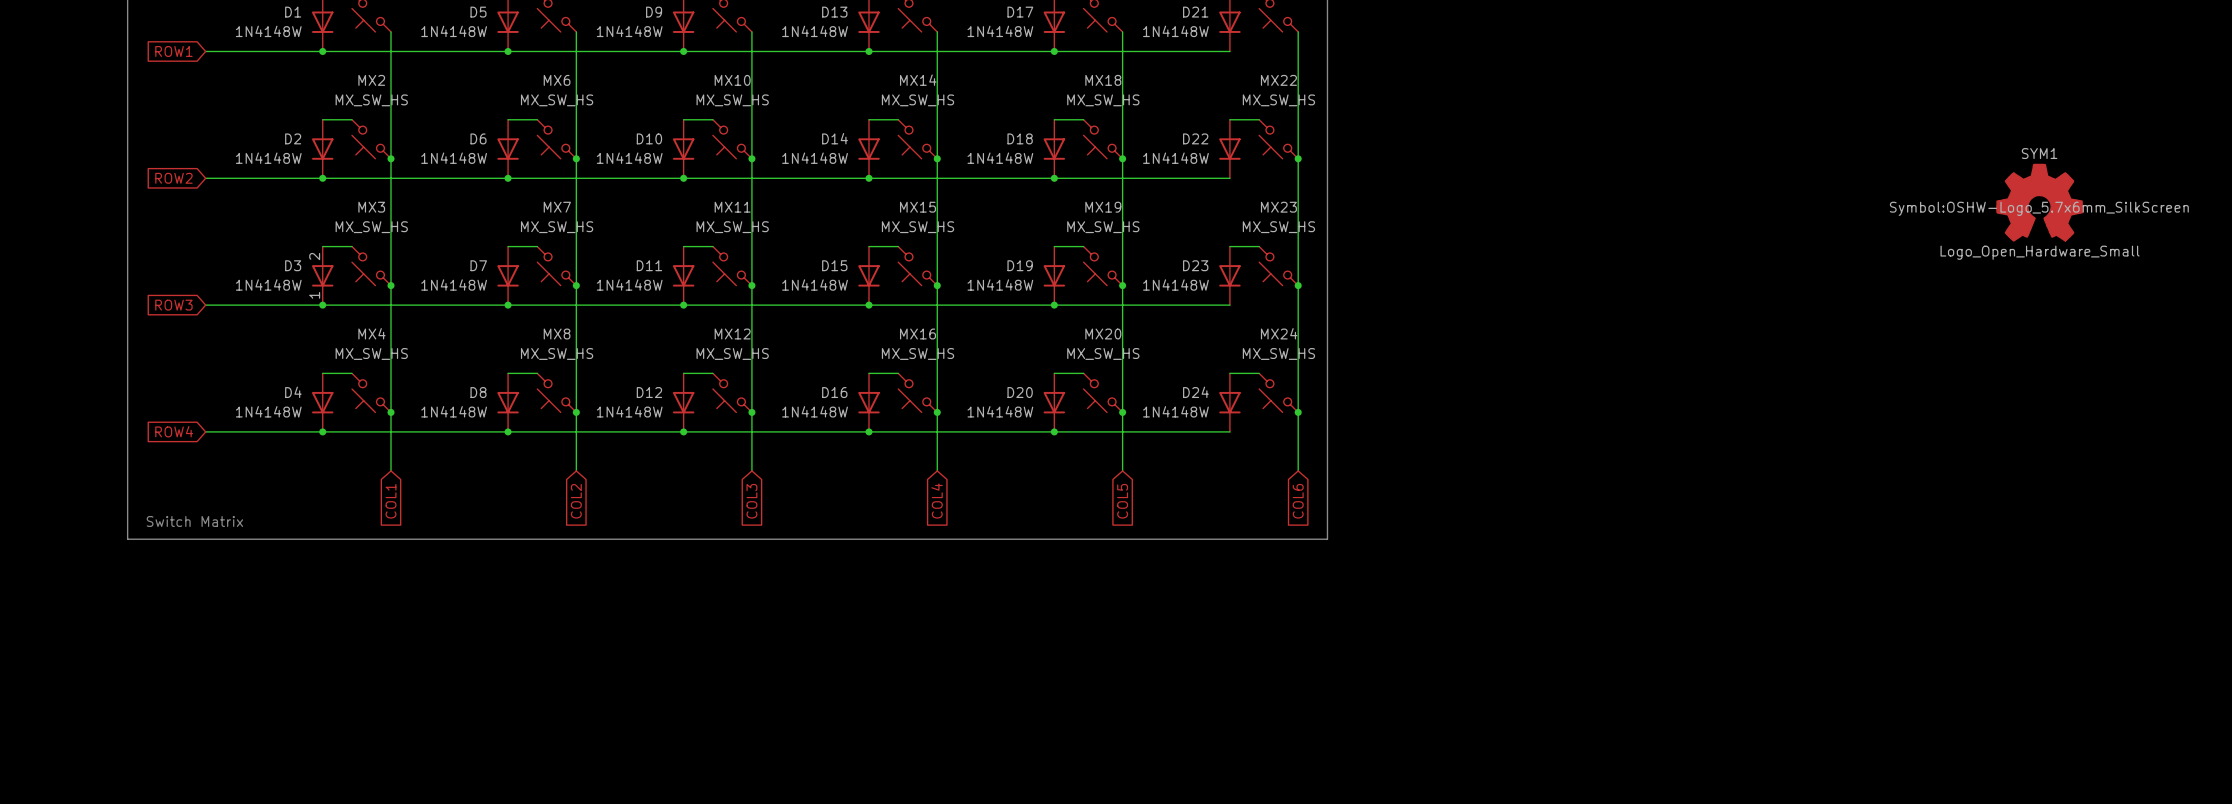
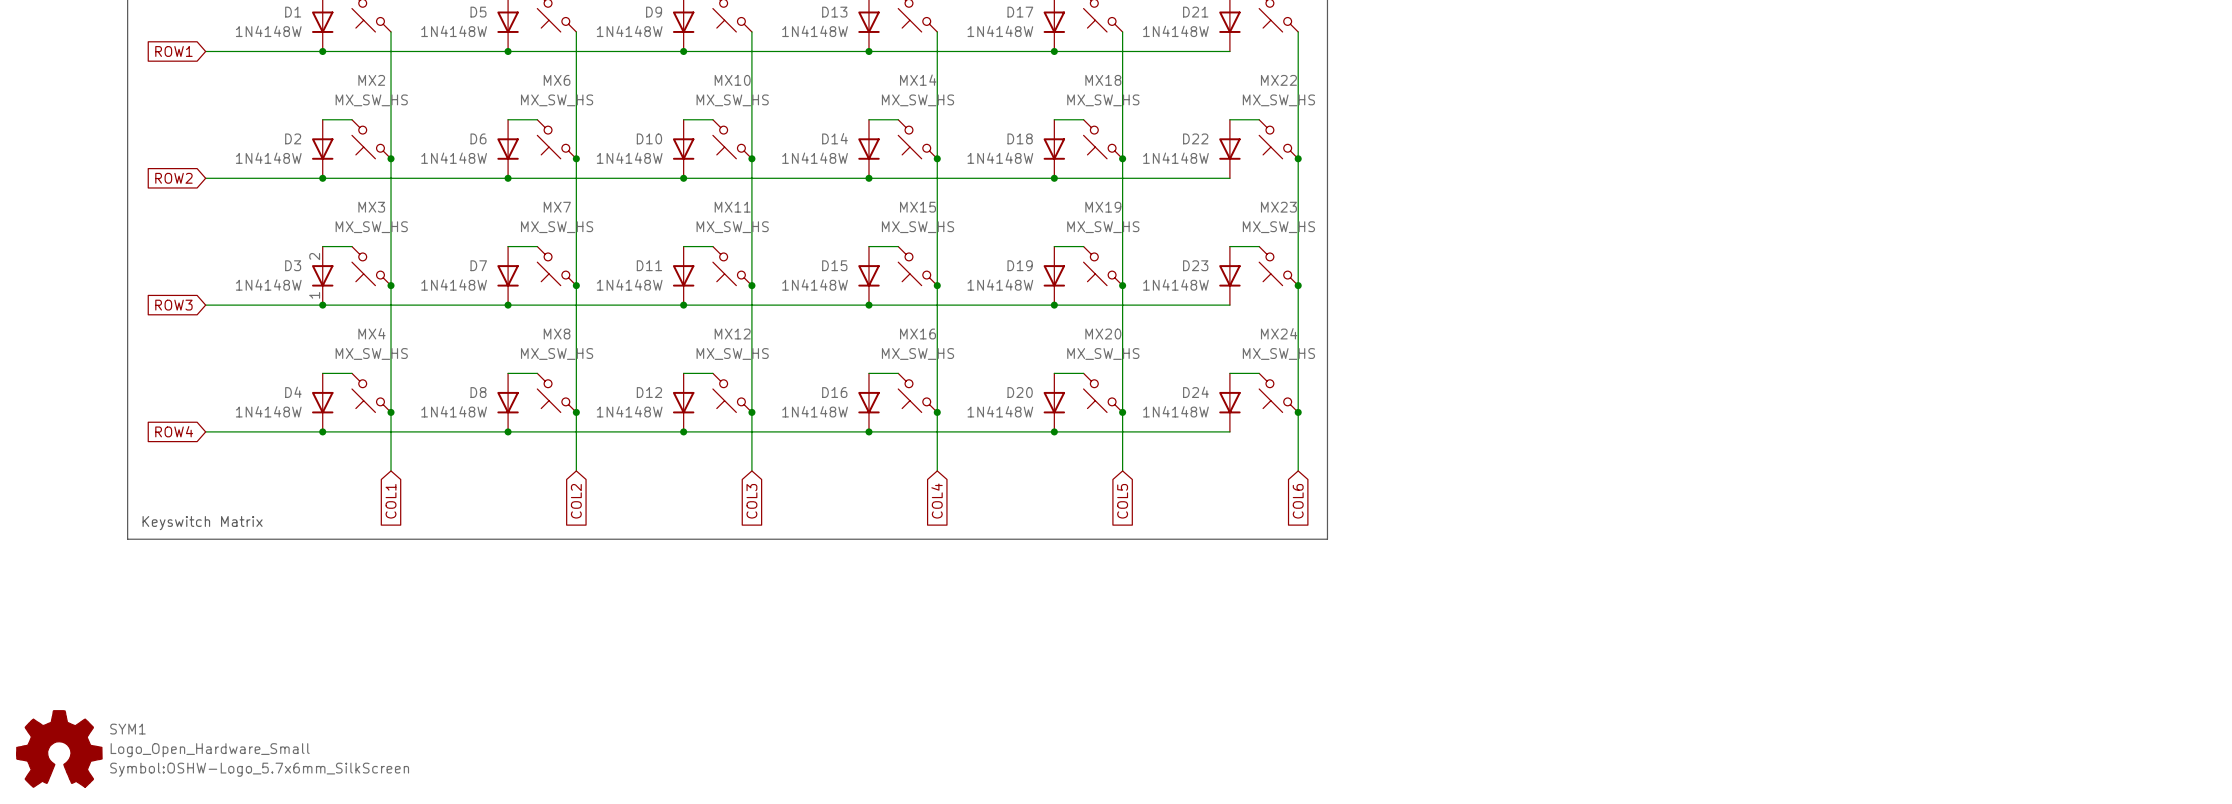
SYM1 name position: SYM1 (2039, 153) -> SYM1 (127, 729)
SYM1 position: (2039, 202) -> (59, 748)
SYM1 text position: Symbol:OSHW-Logo_5.7x6mm_SilkScreen (2039, 208) -> Symbol:OSHW-Logo_5.7x6mm_SilkScreen (259, 769)
SYM1 value position: Logo_Open_Hardware_Small (2040, 252) -> Logo_Open_Hardware_Small (210, 750)
text: Switch Matrix (194, 521) -> Keyswitch Matrix (202, 523)

